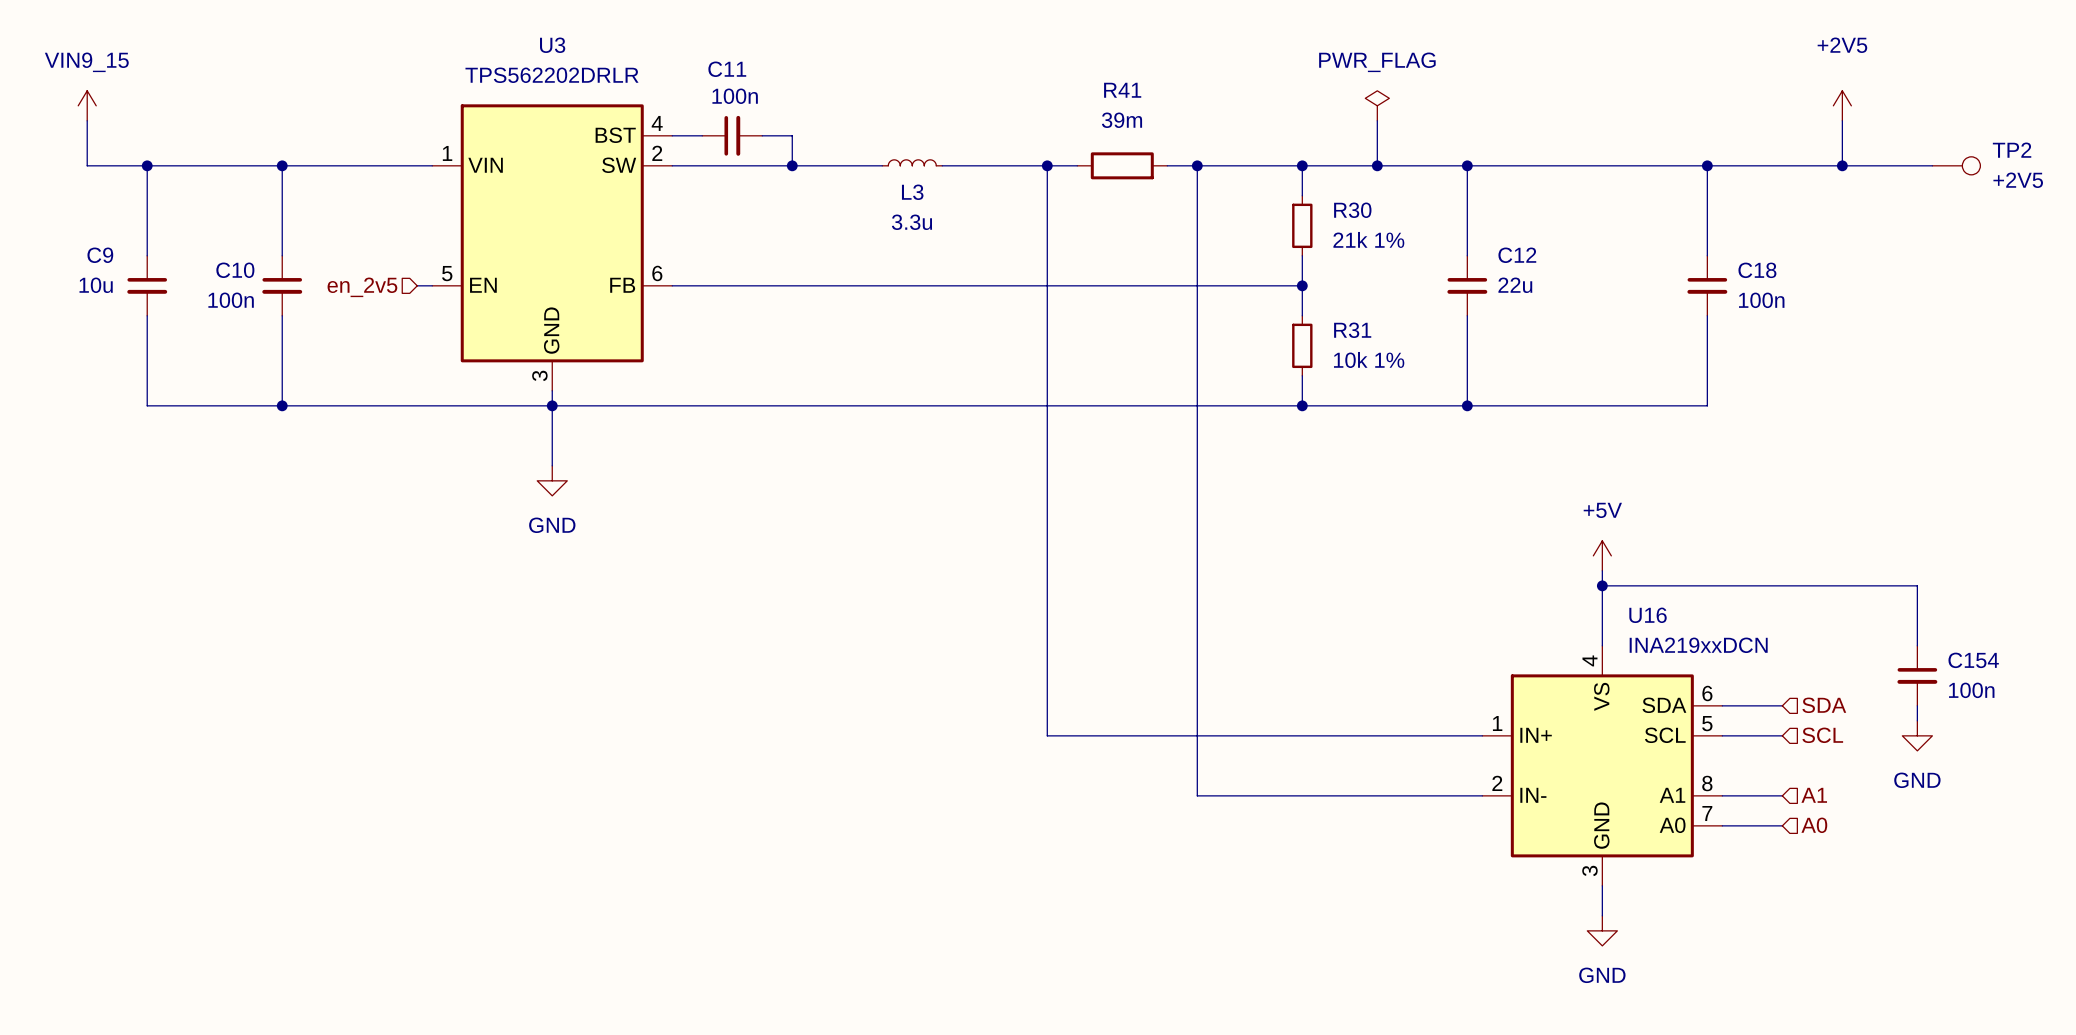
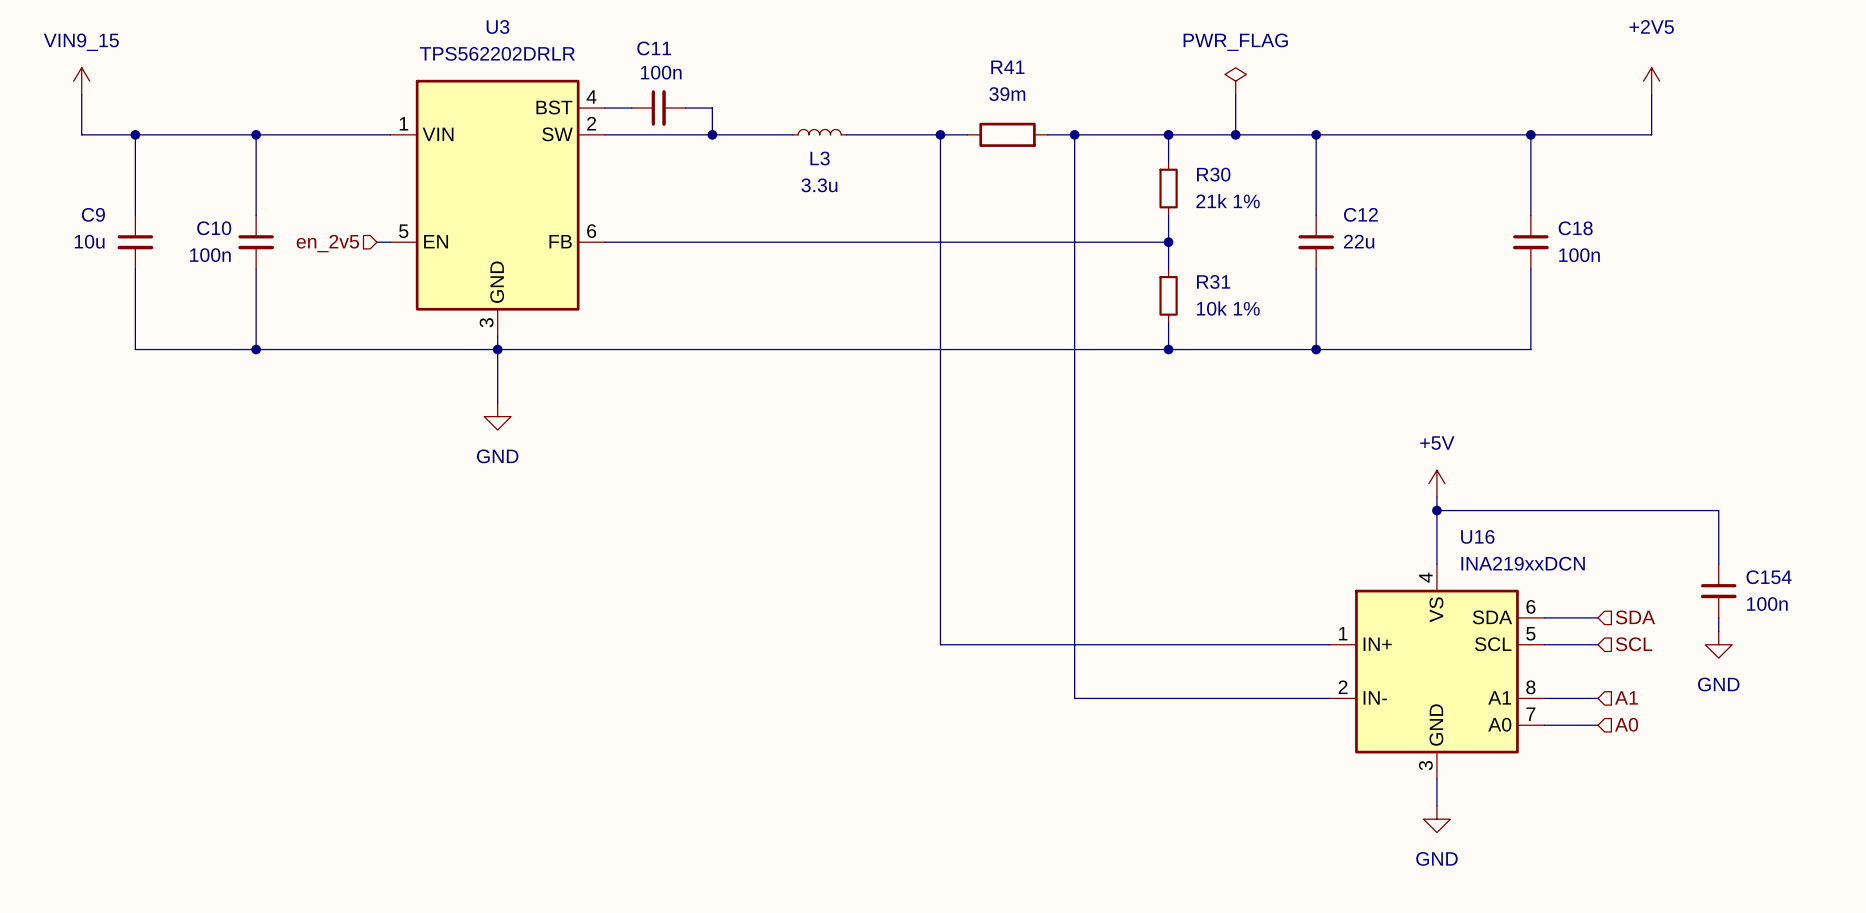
wire: (1842, 165) (1932, 165) -> none
junction: (1842, 165) -> none
TP2: +2V5 (1956, 165) -> none

